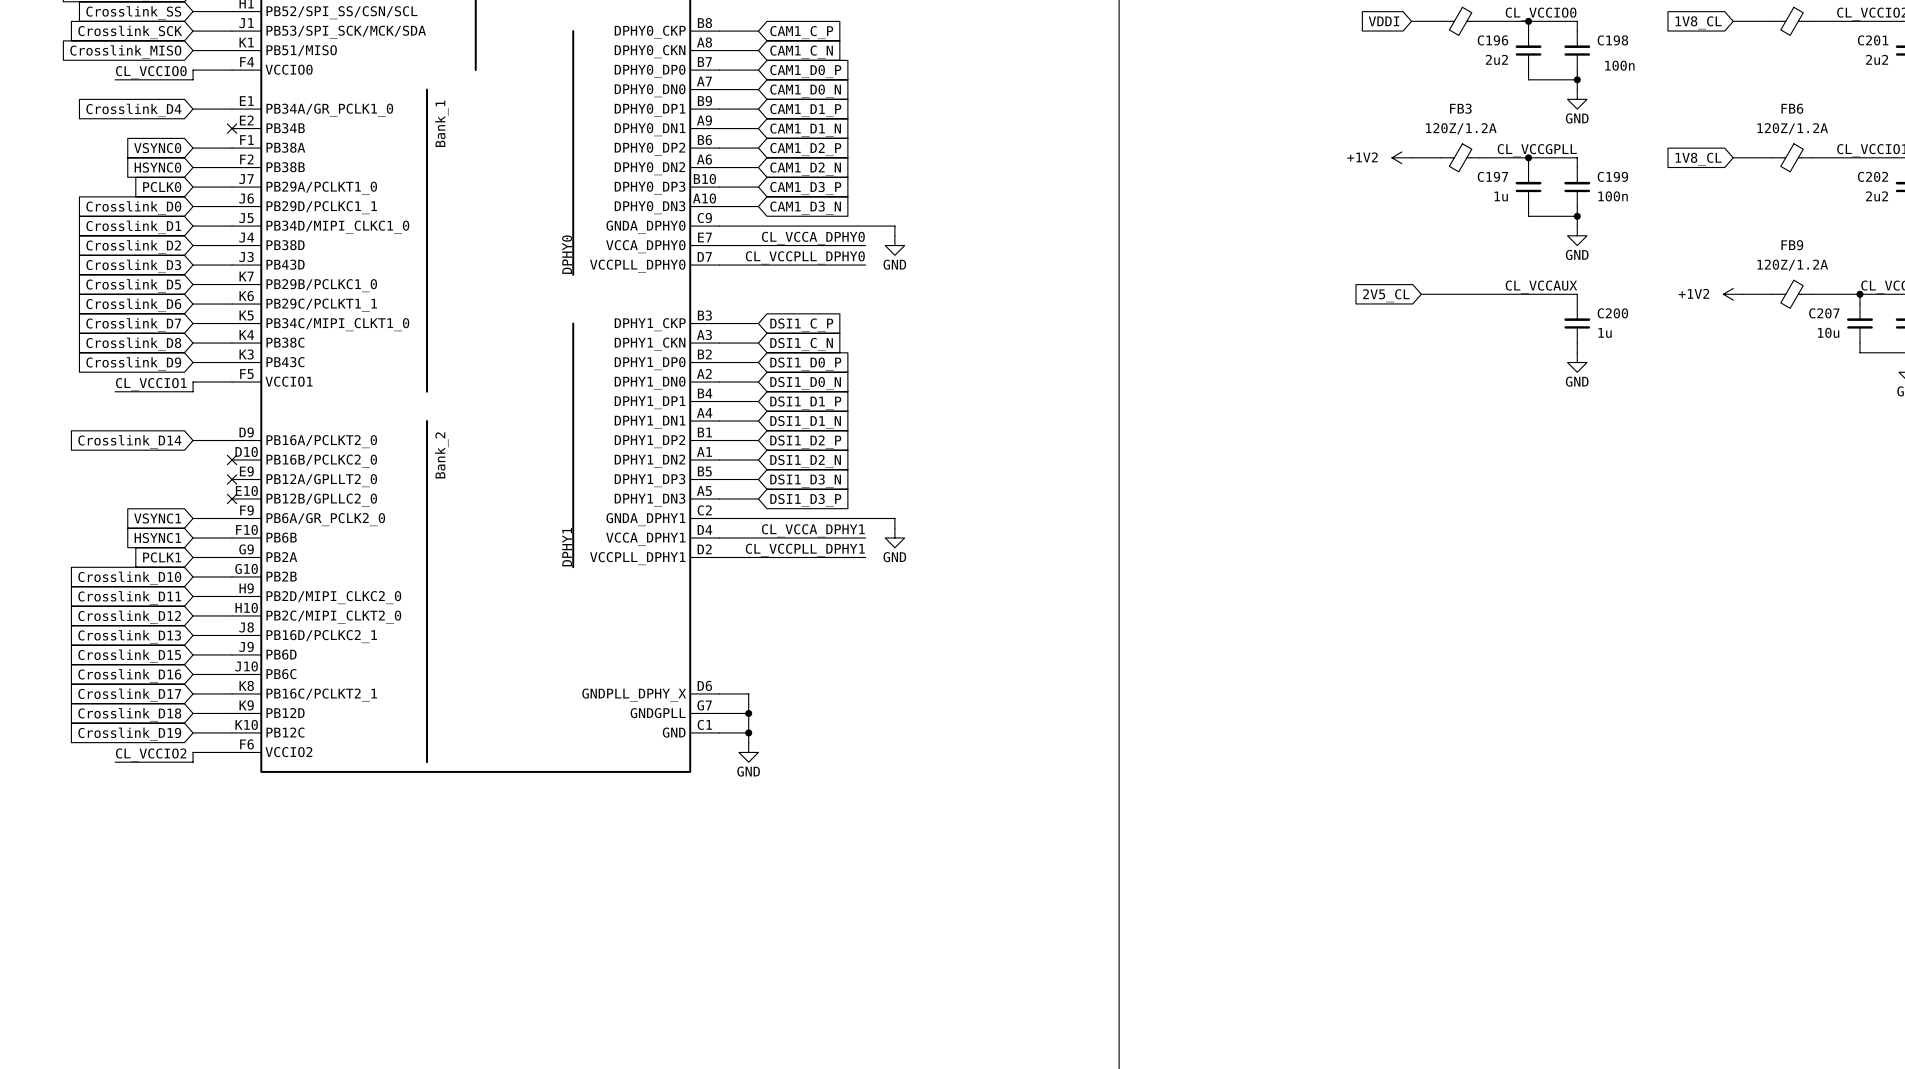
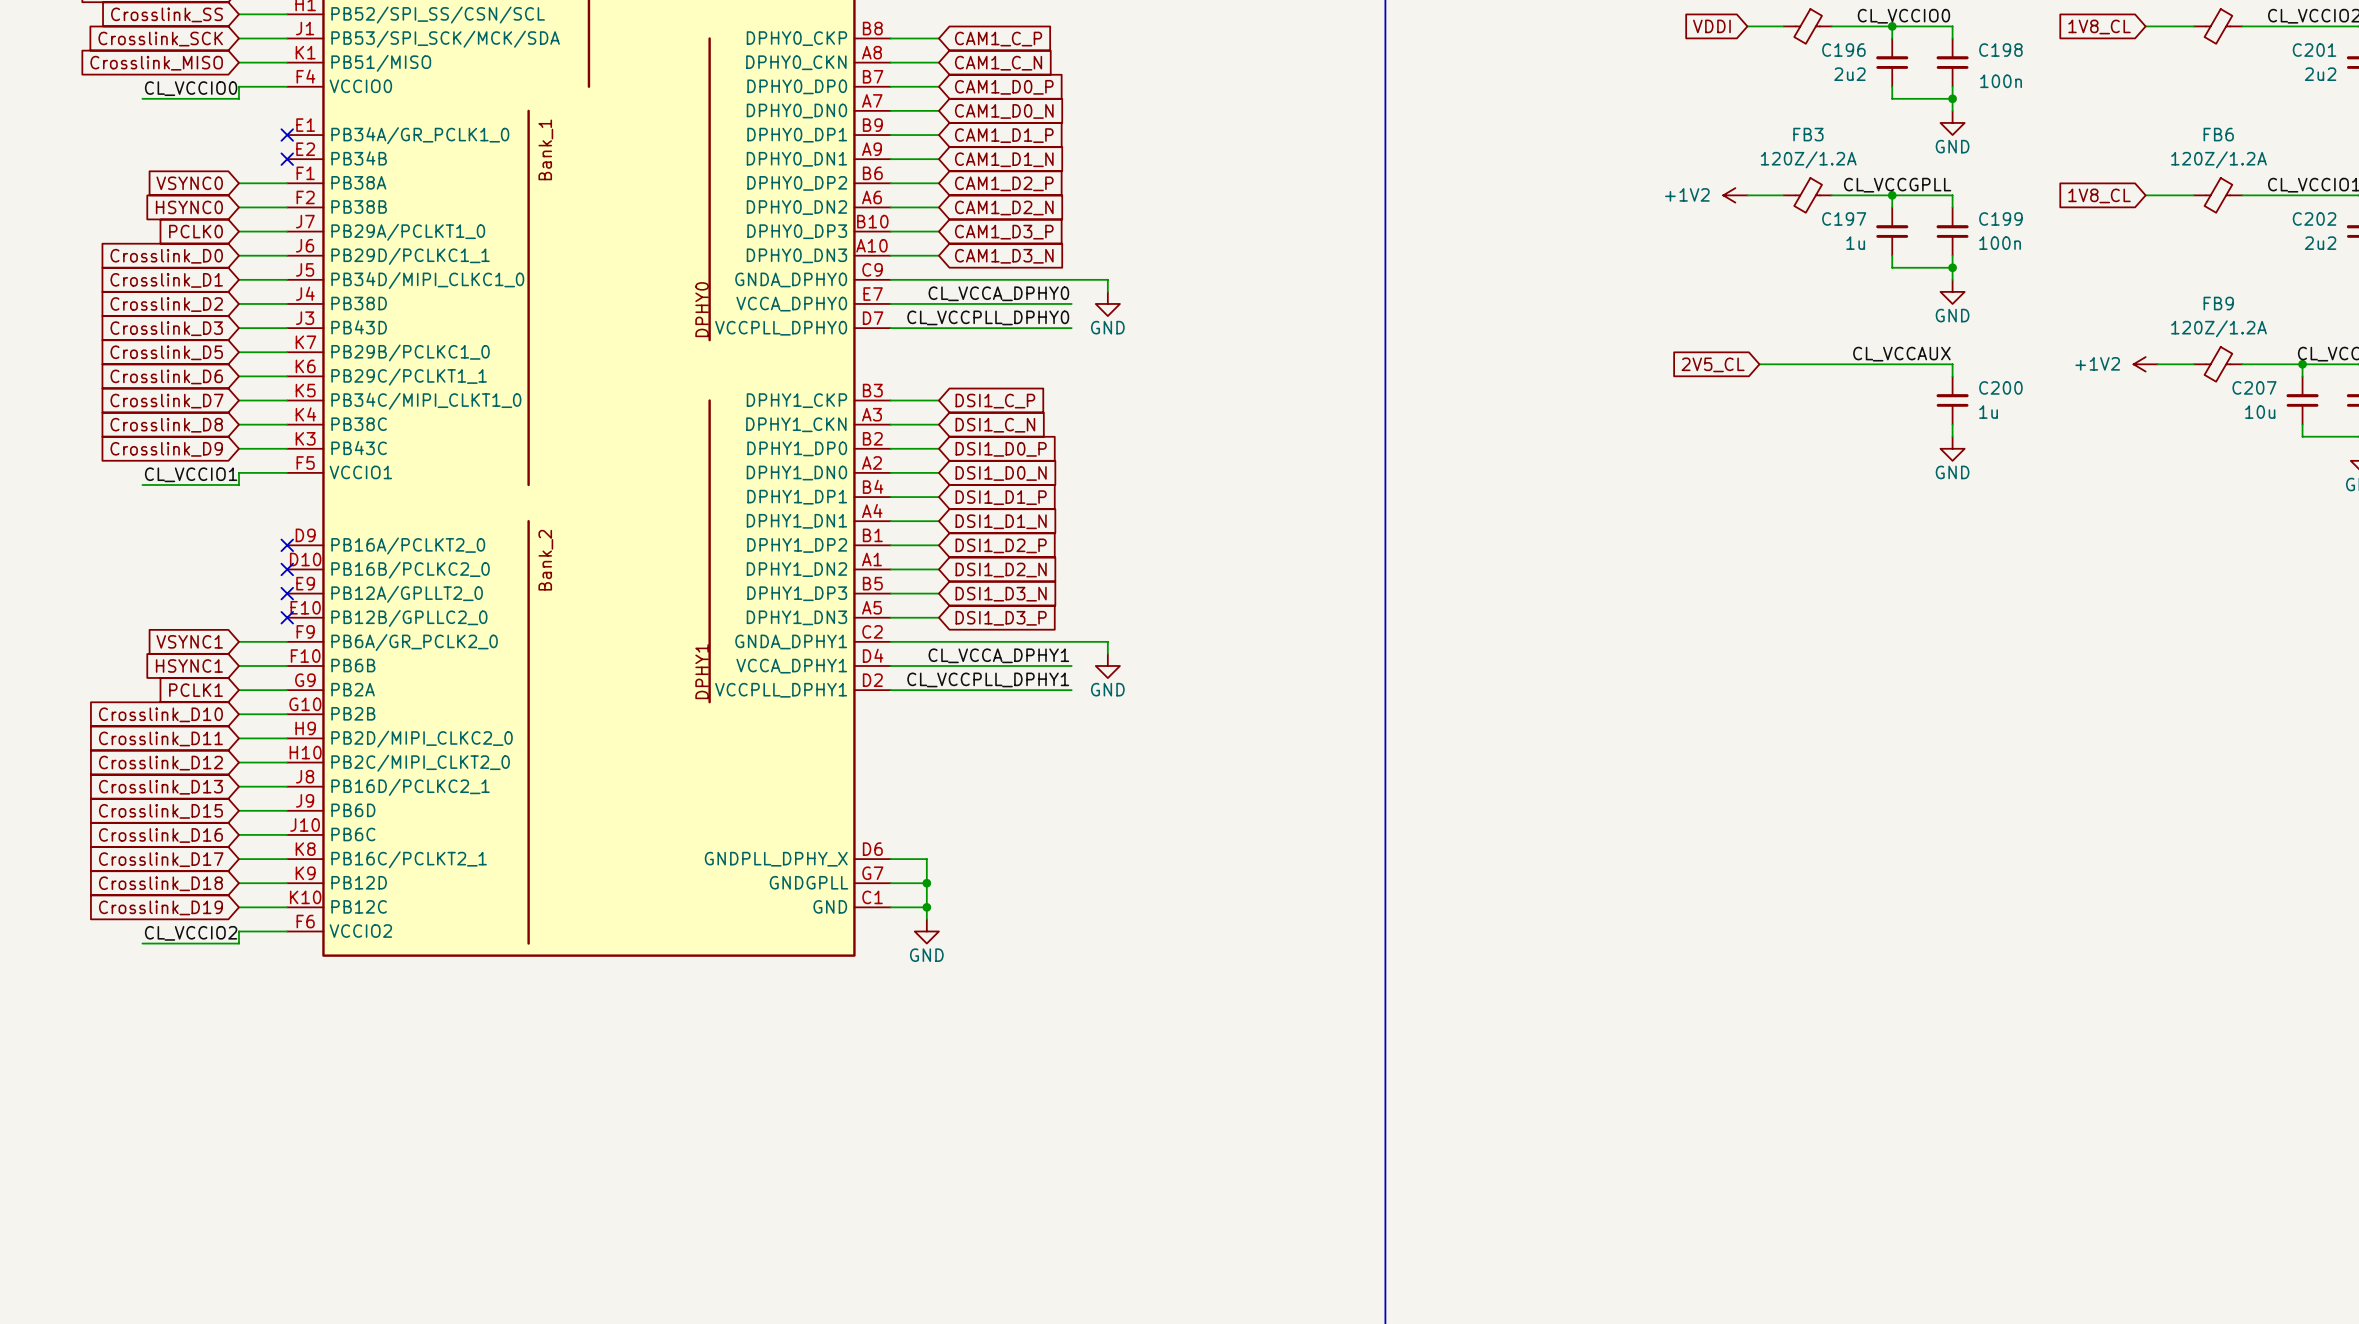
wire: (193, 109) (232, 109) -> none
no-connect mark: none -> (287, 135)
global label: Crosslink_D4 (133, 110) -> none
wire: (193, 440) (232, 440) -> none
no-connect mark: none -> (287, 545)
global label: Crosslink_D14 (129, 441) -> none

